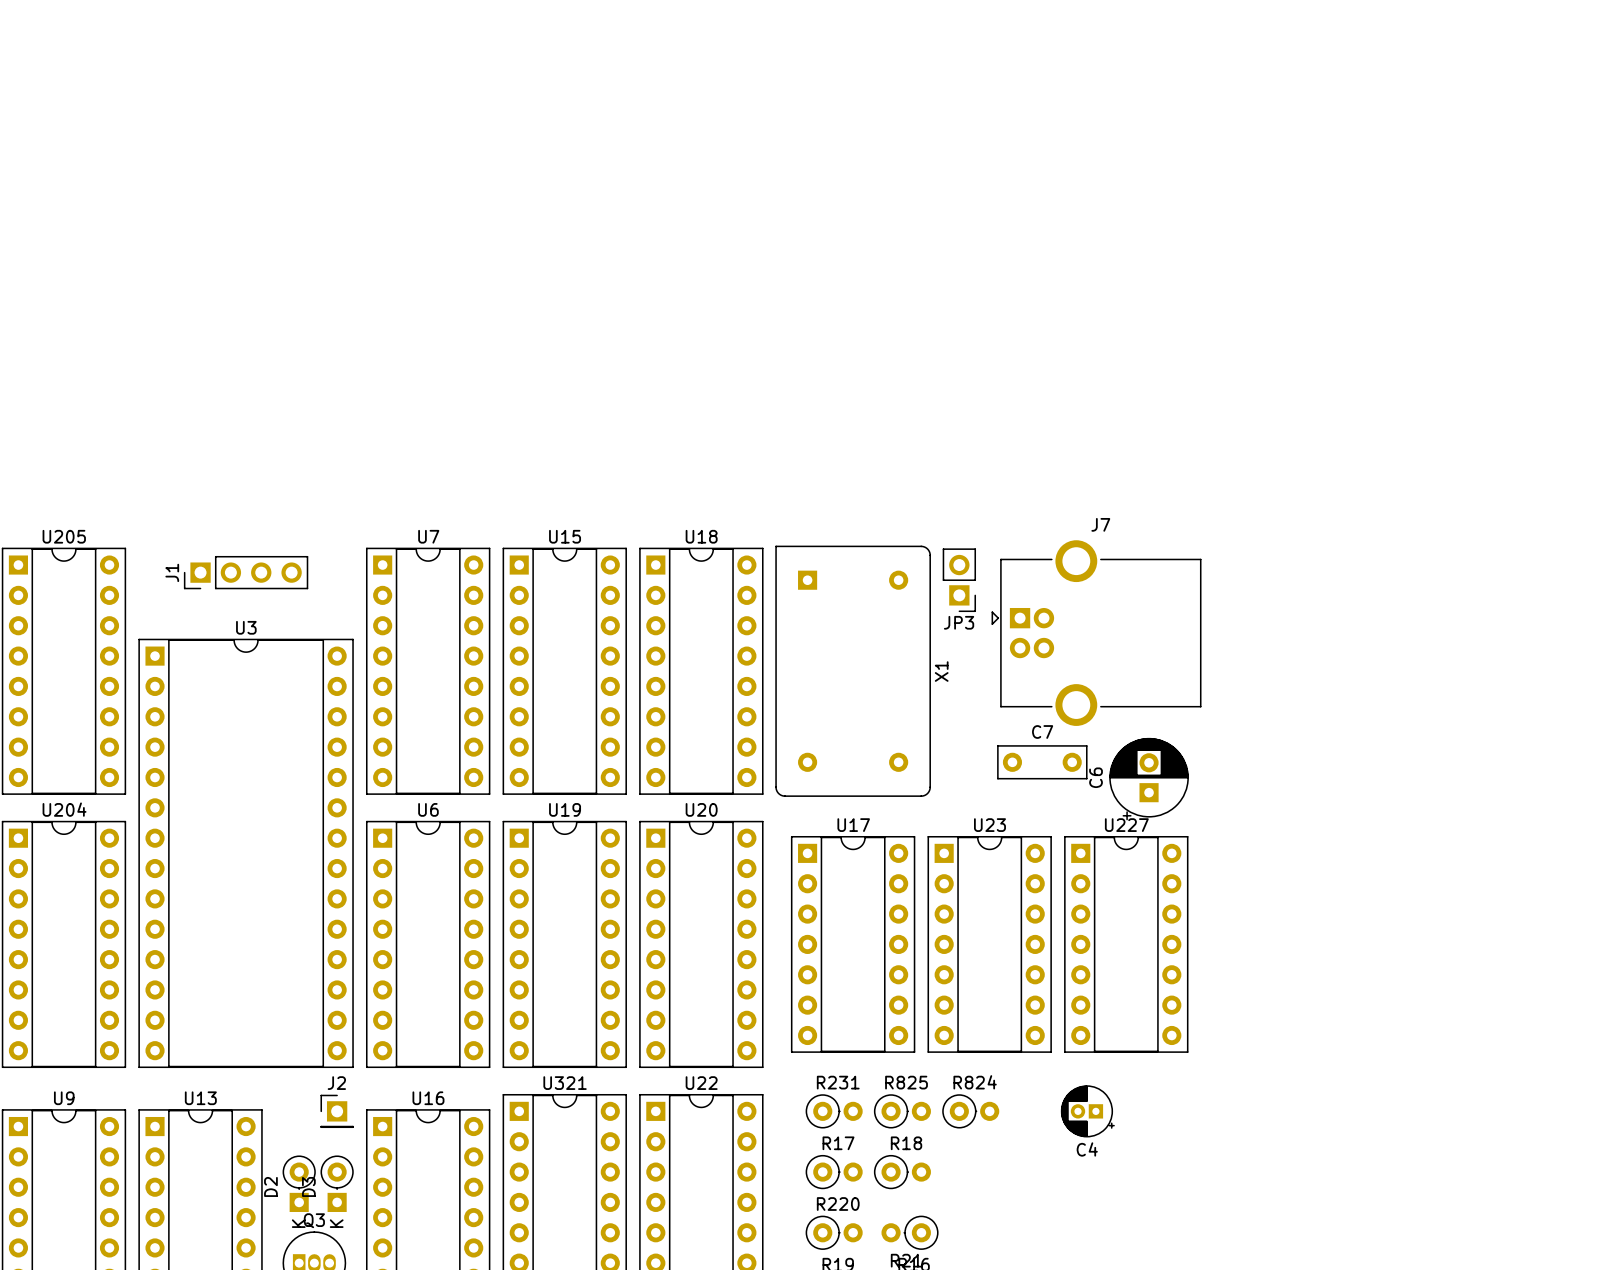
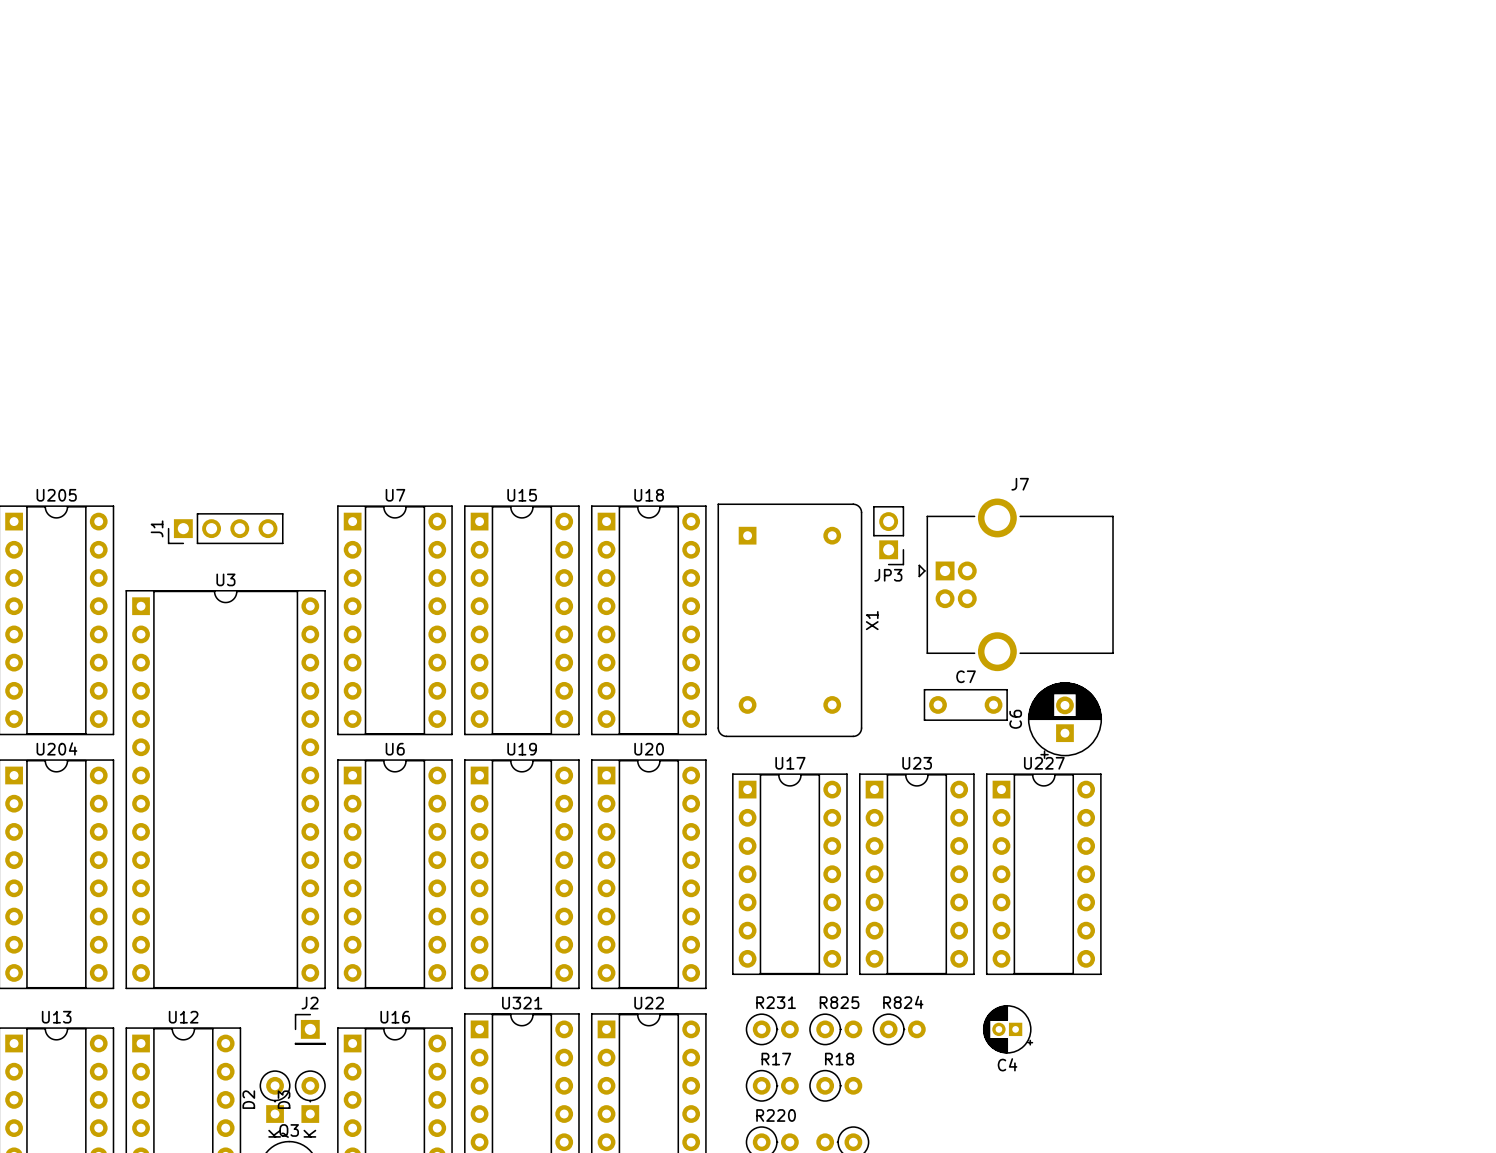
U9 name: U9 (64, 1098) -> U13 (56, 1017)
U13 name: U13 (200, 1098) -> U12 (183, 1017)

